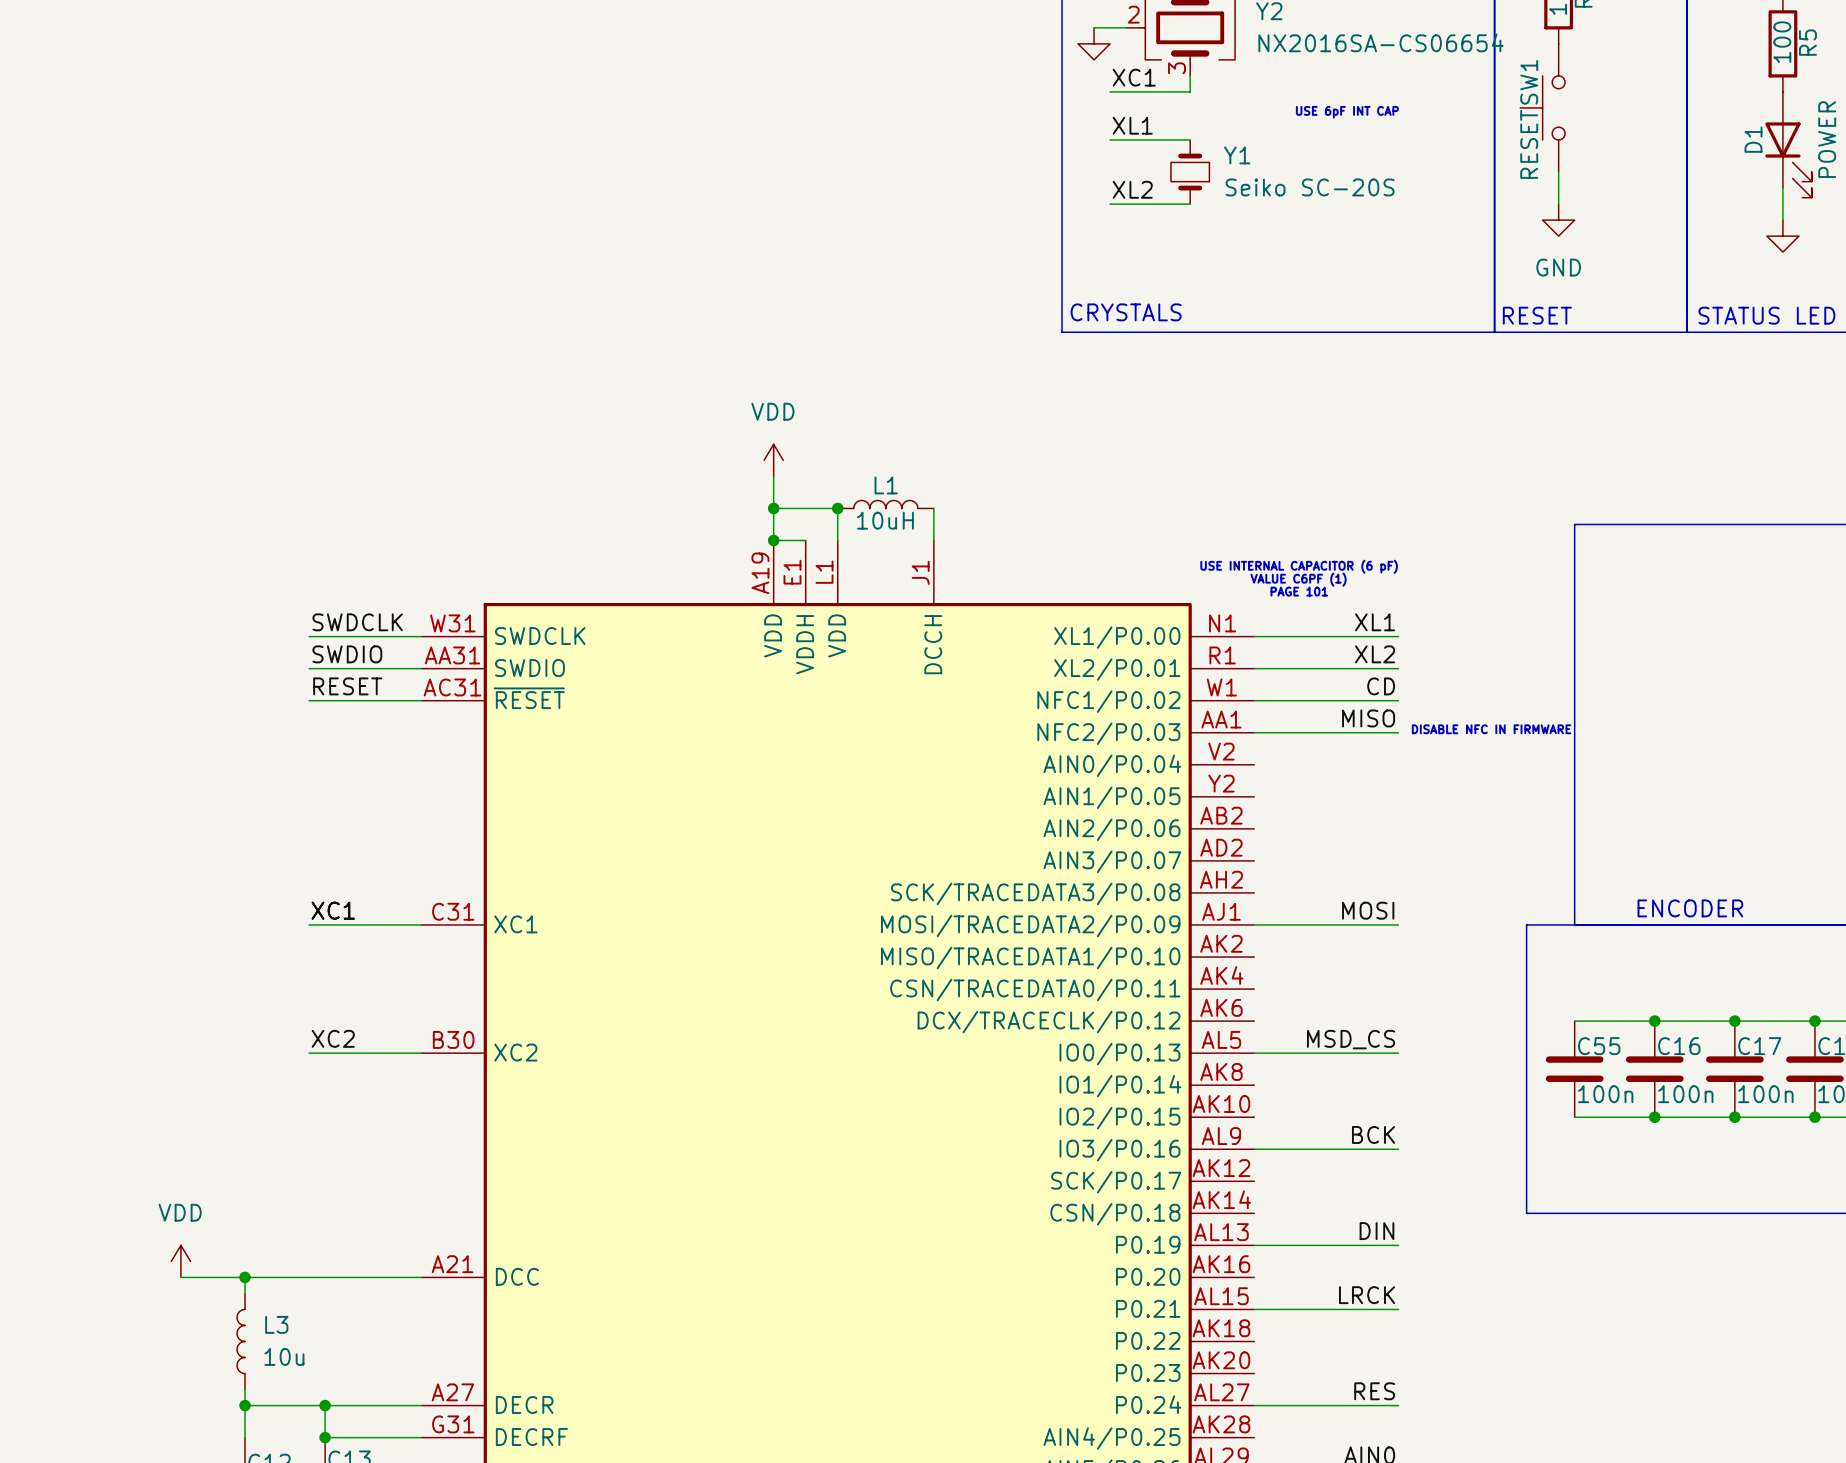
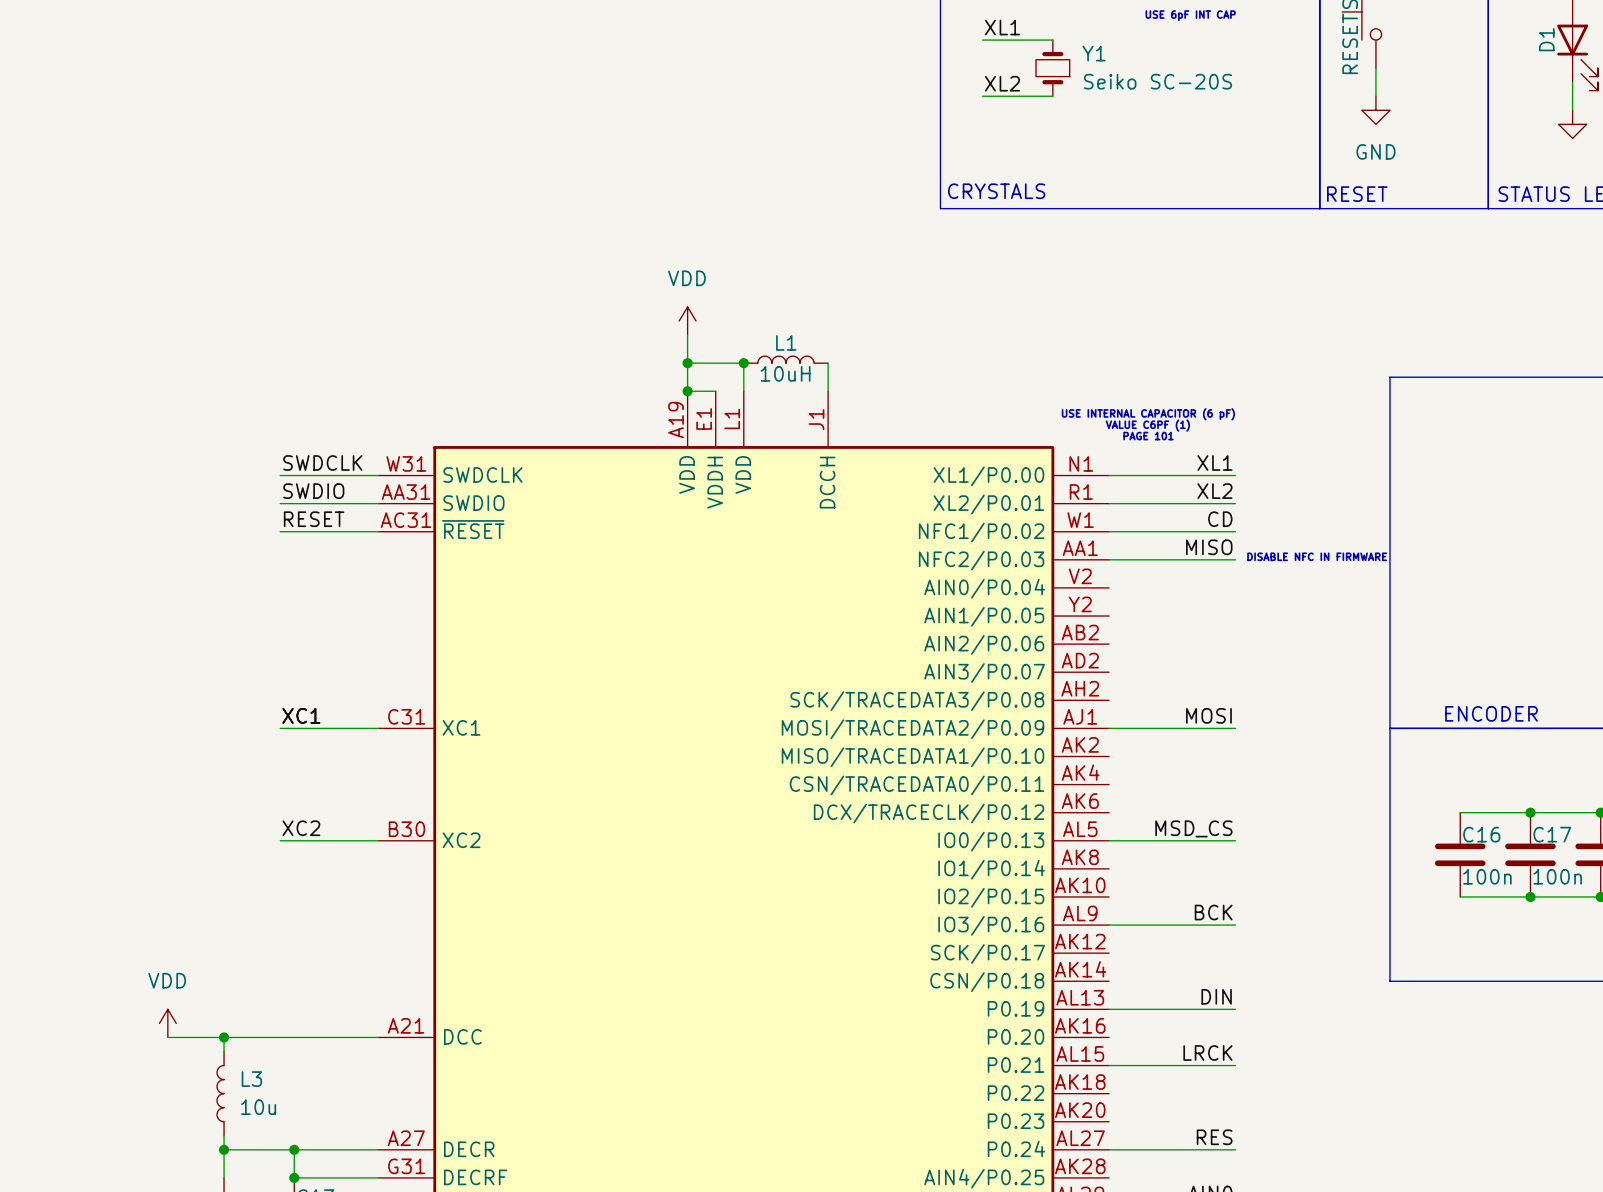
line: (1574, 924) (1526, 924) (1526, 1213) (1574, 1213) -> (1389, 728) (1389, 981)
wire: (1574, 1021) (1654, 1021) -> none
junction: (1654, 1021) -> none
C55: 100n (1574, 1069) -> none
wire: (1574, 1117) (1654, 1117) -> none
junction: (1654, 1117) -> none

